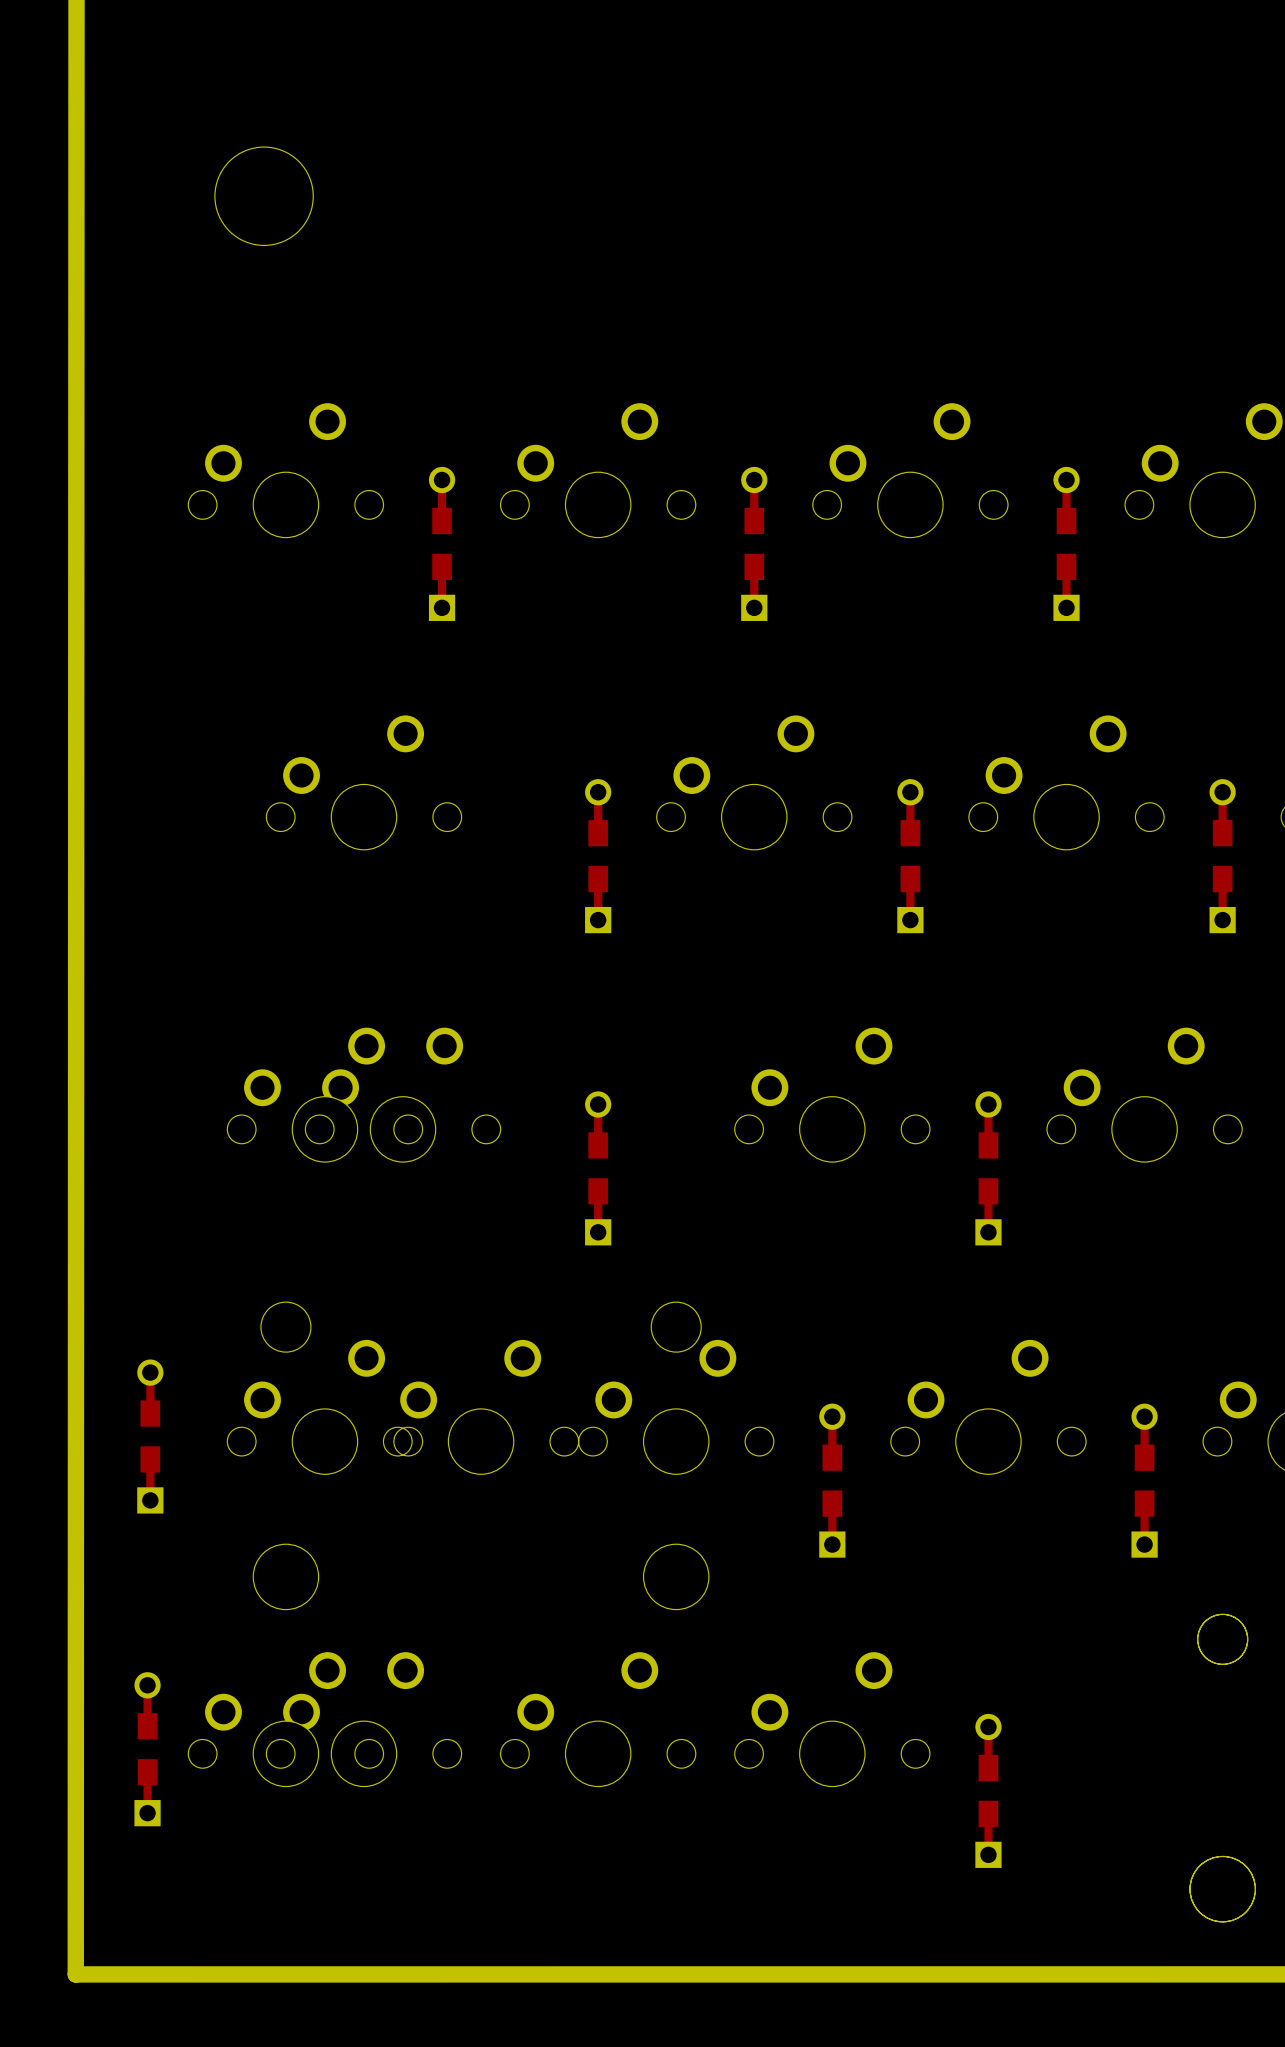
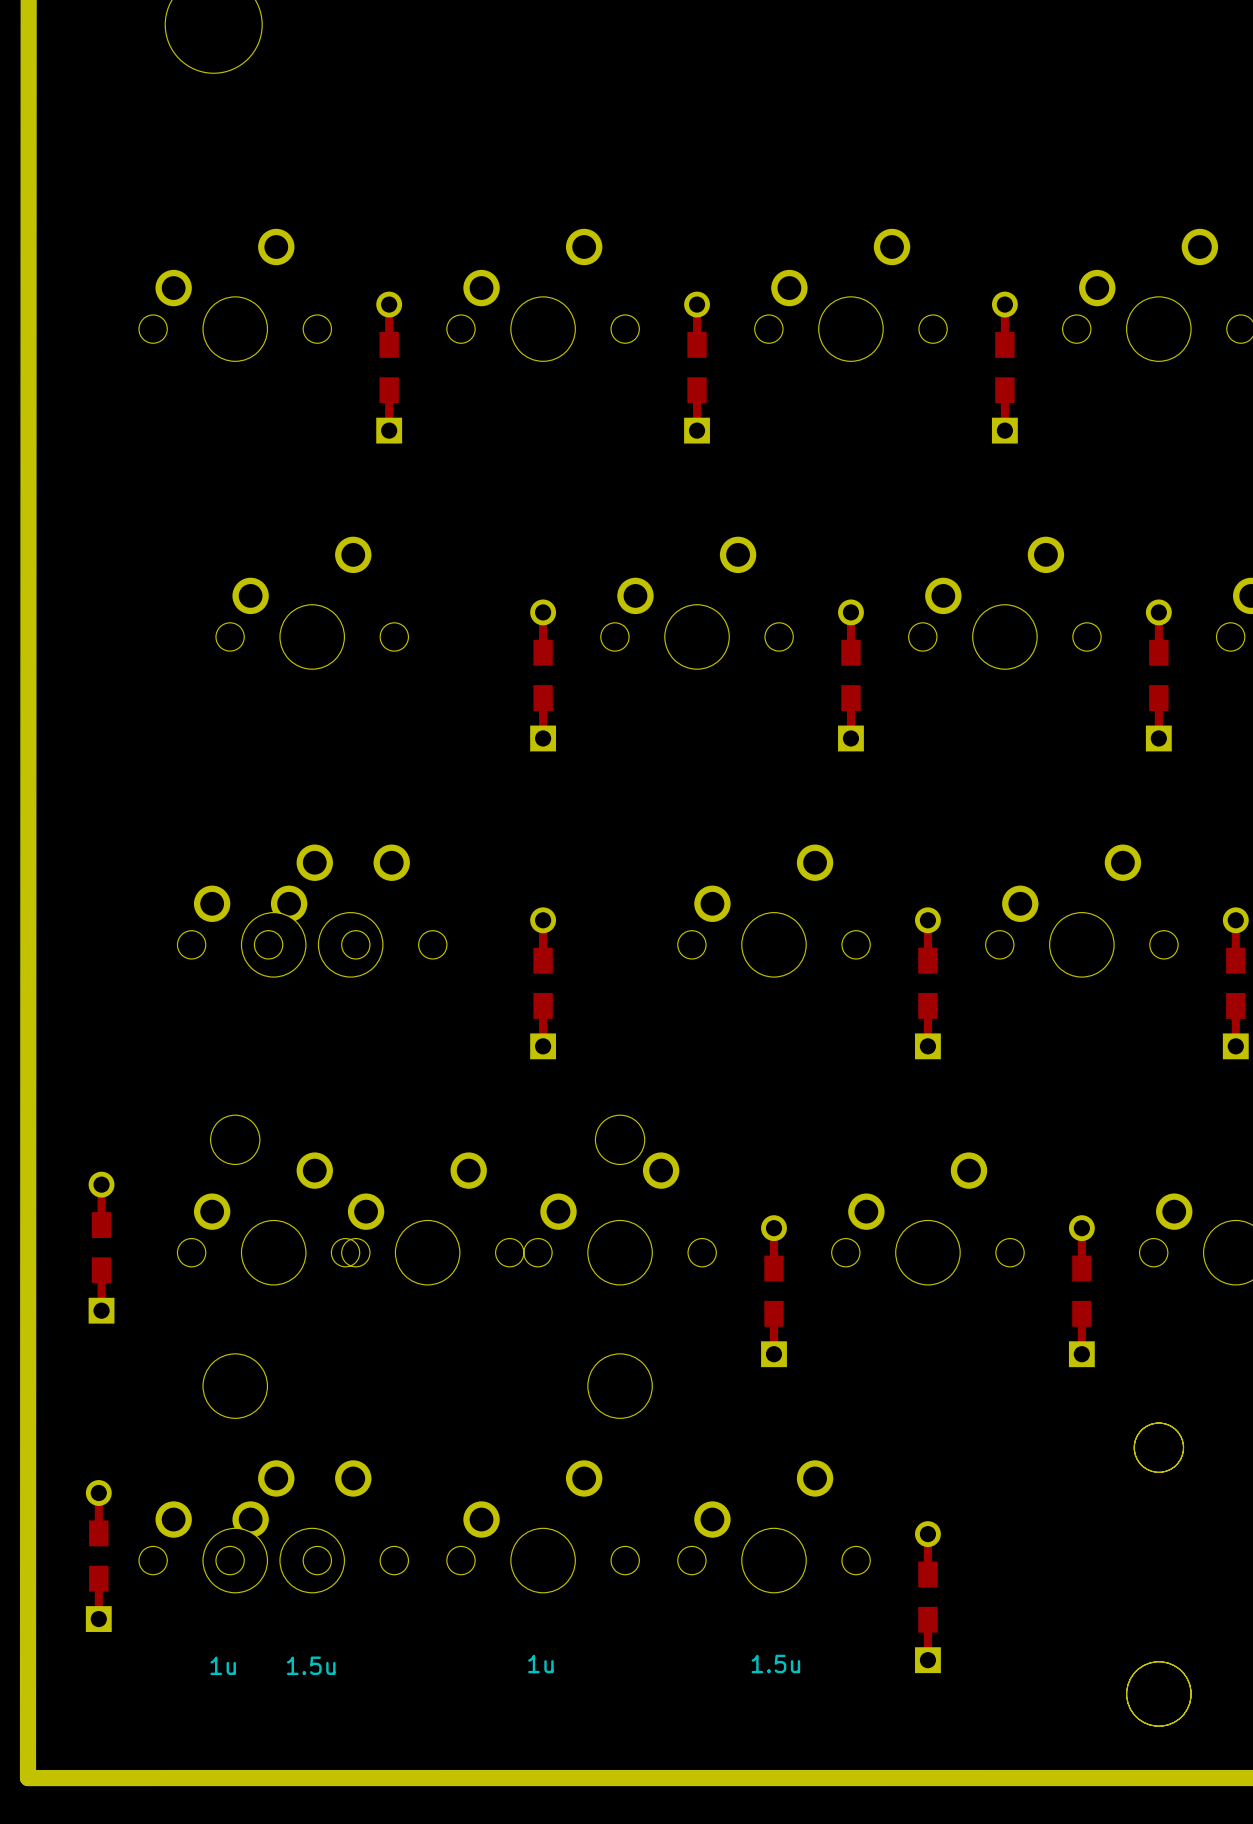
text: none -> 1u (540, 1664)
text: none -> 1.5u (775, 1664)
text: none -> 1u (223, 1665)
text: none -> 1.5u (311, 1665)

